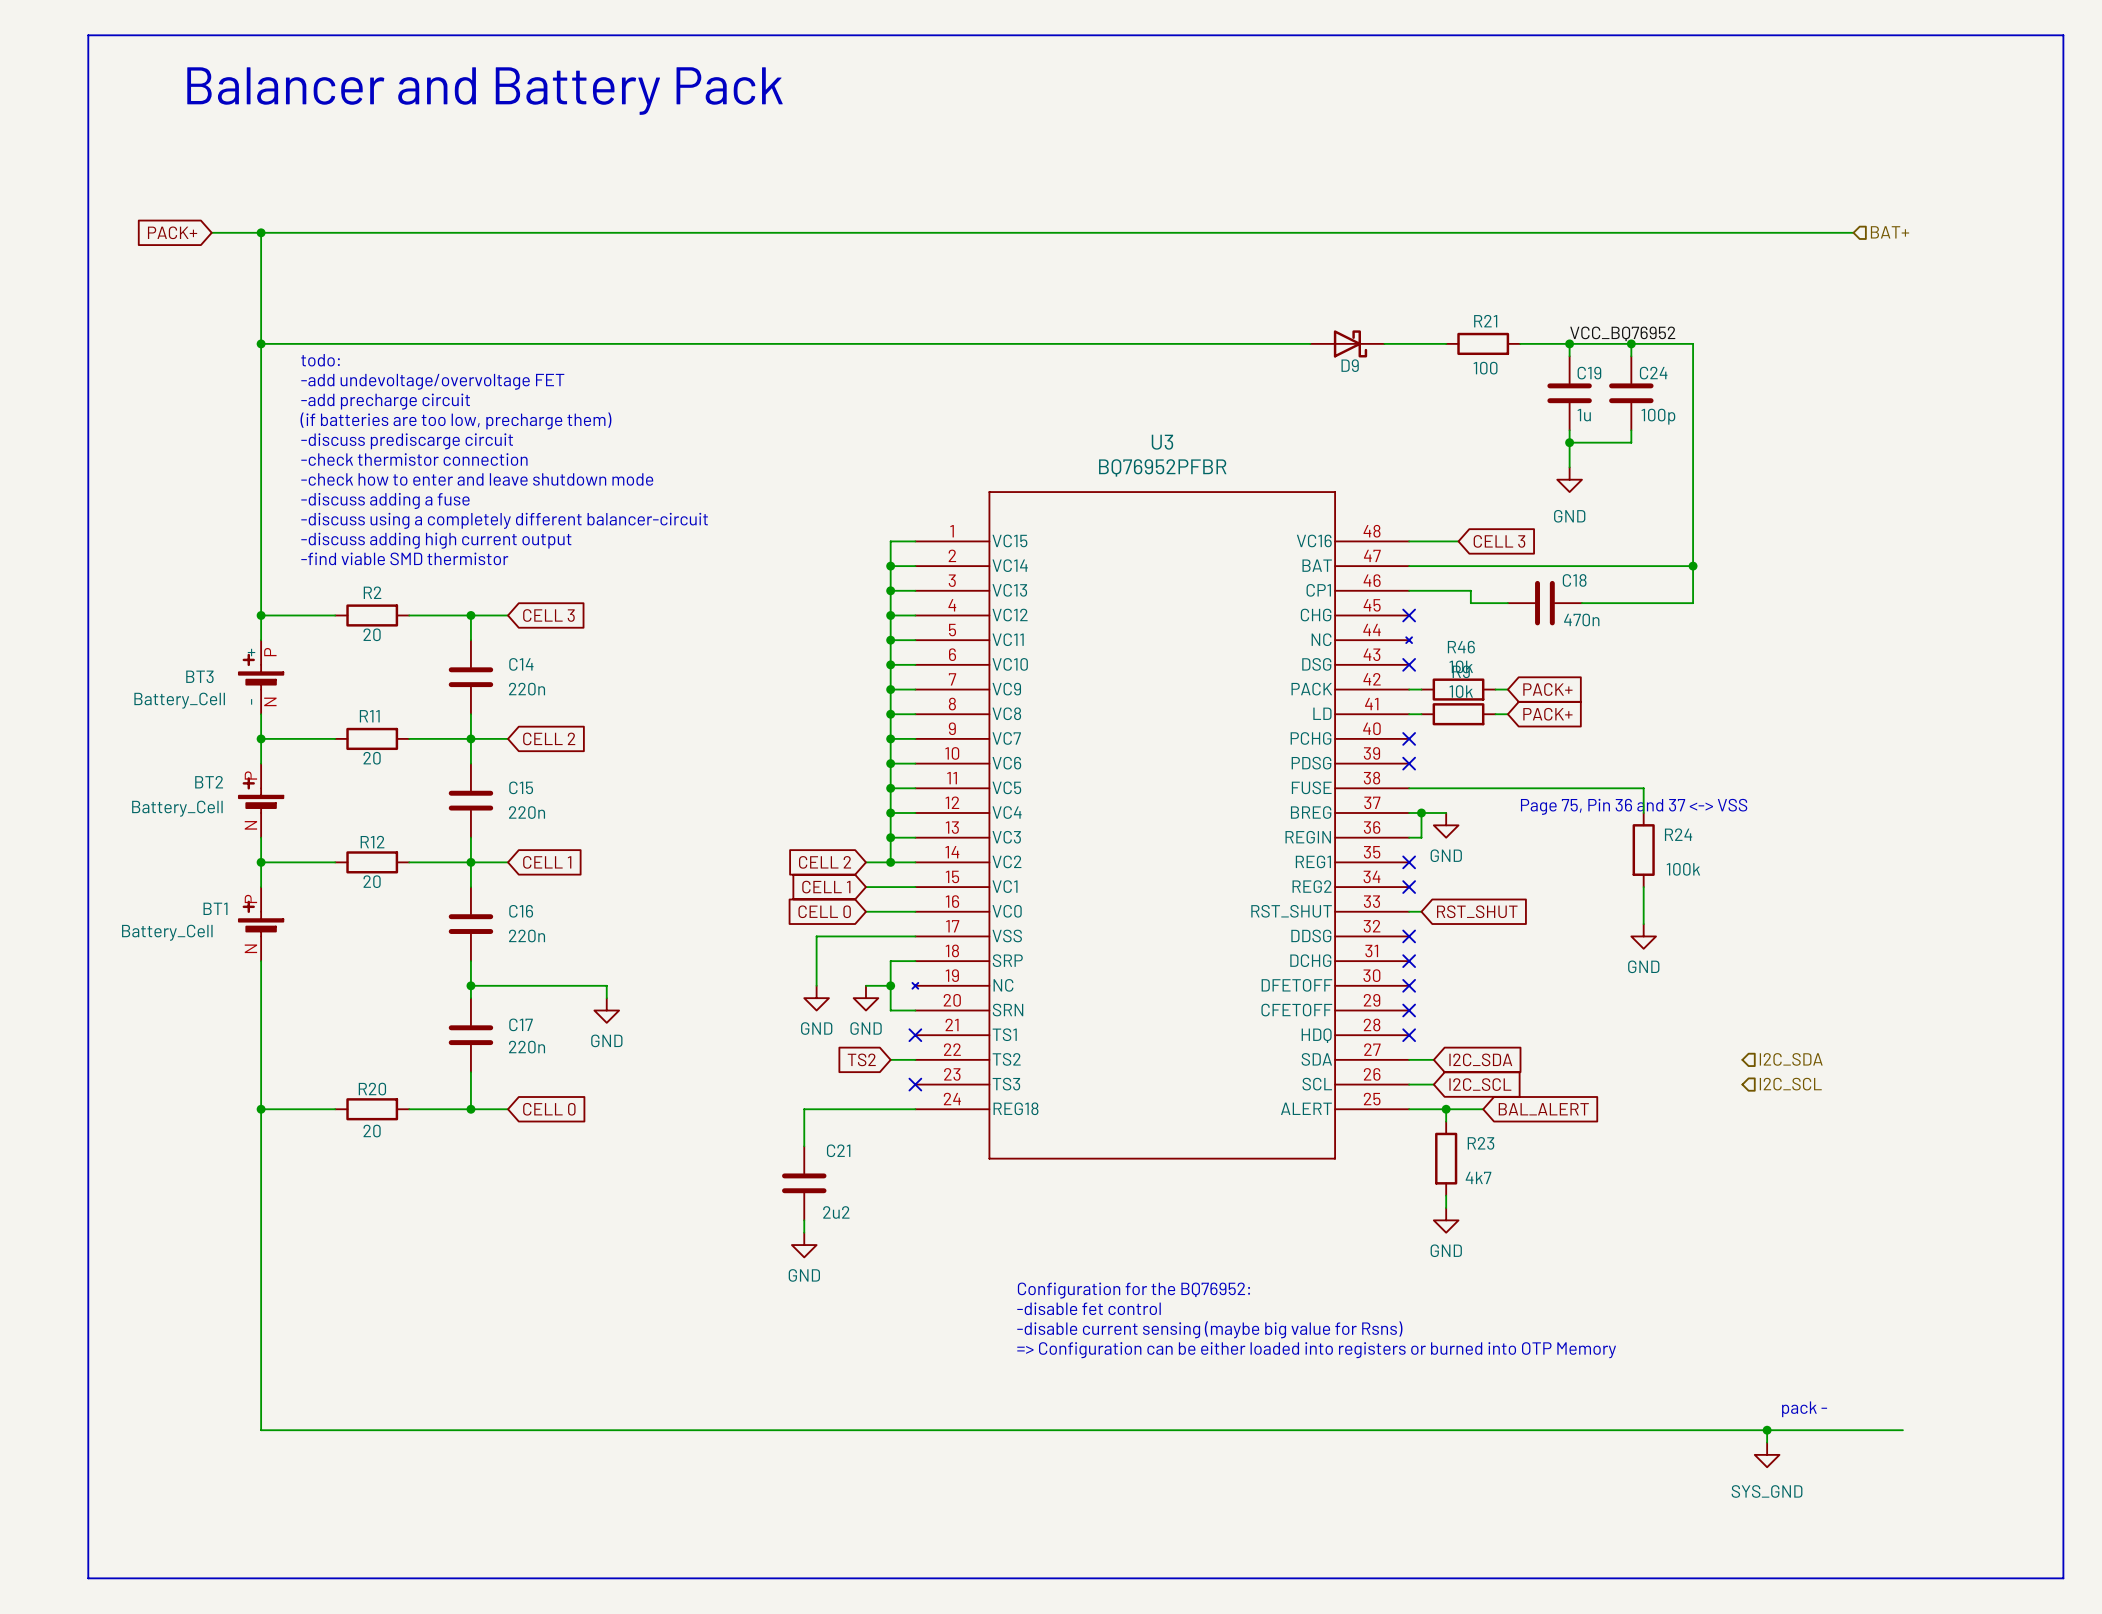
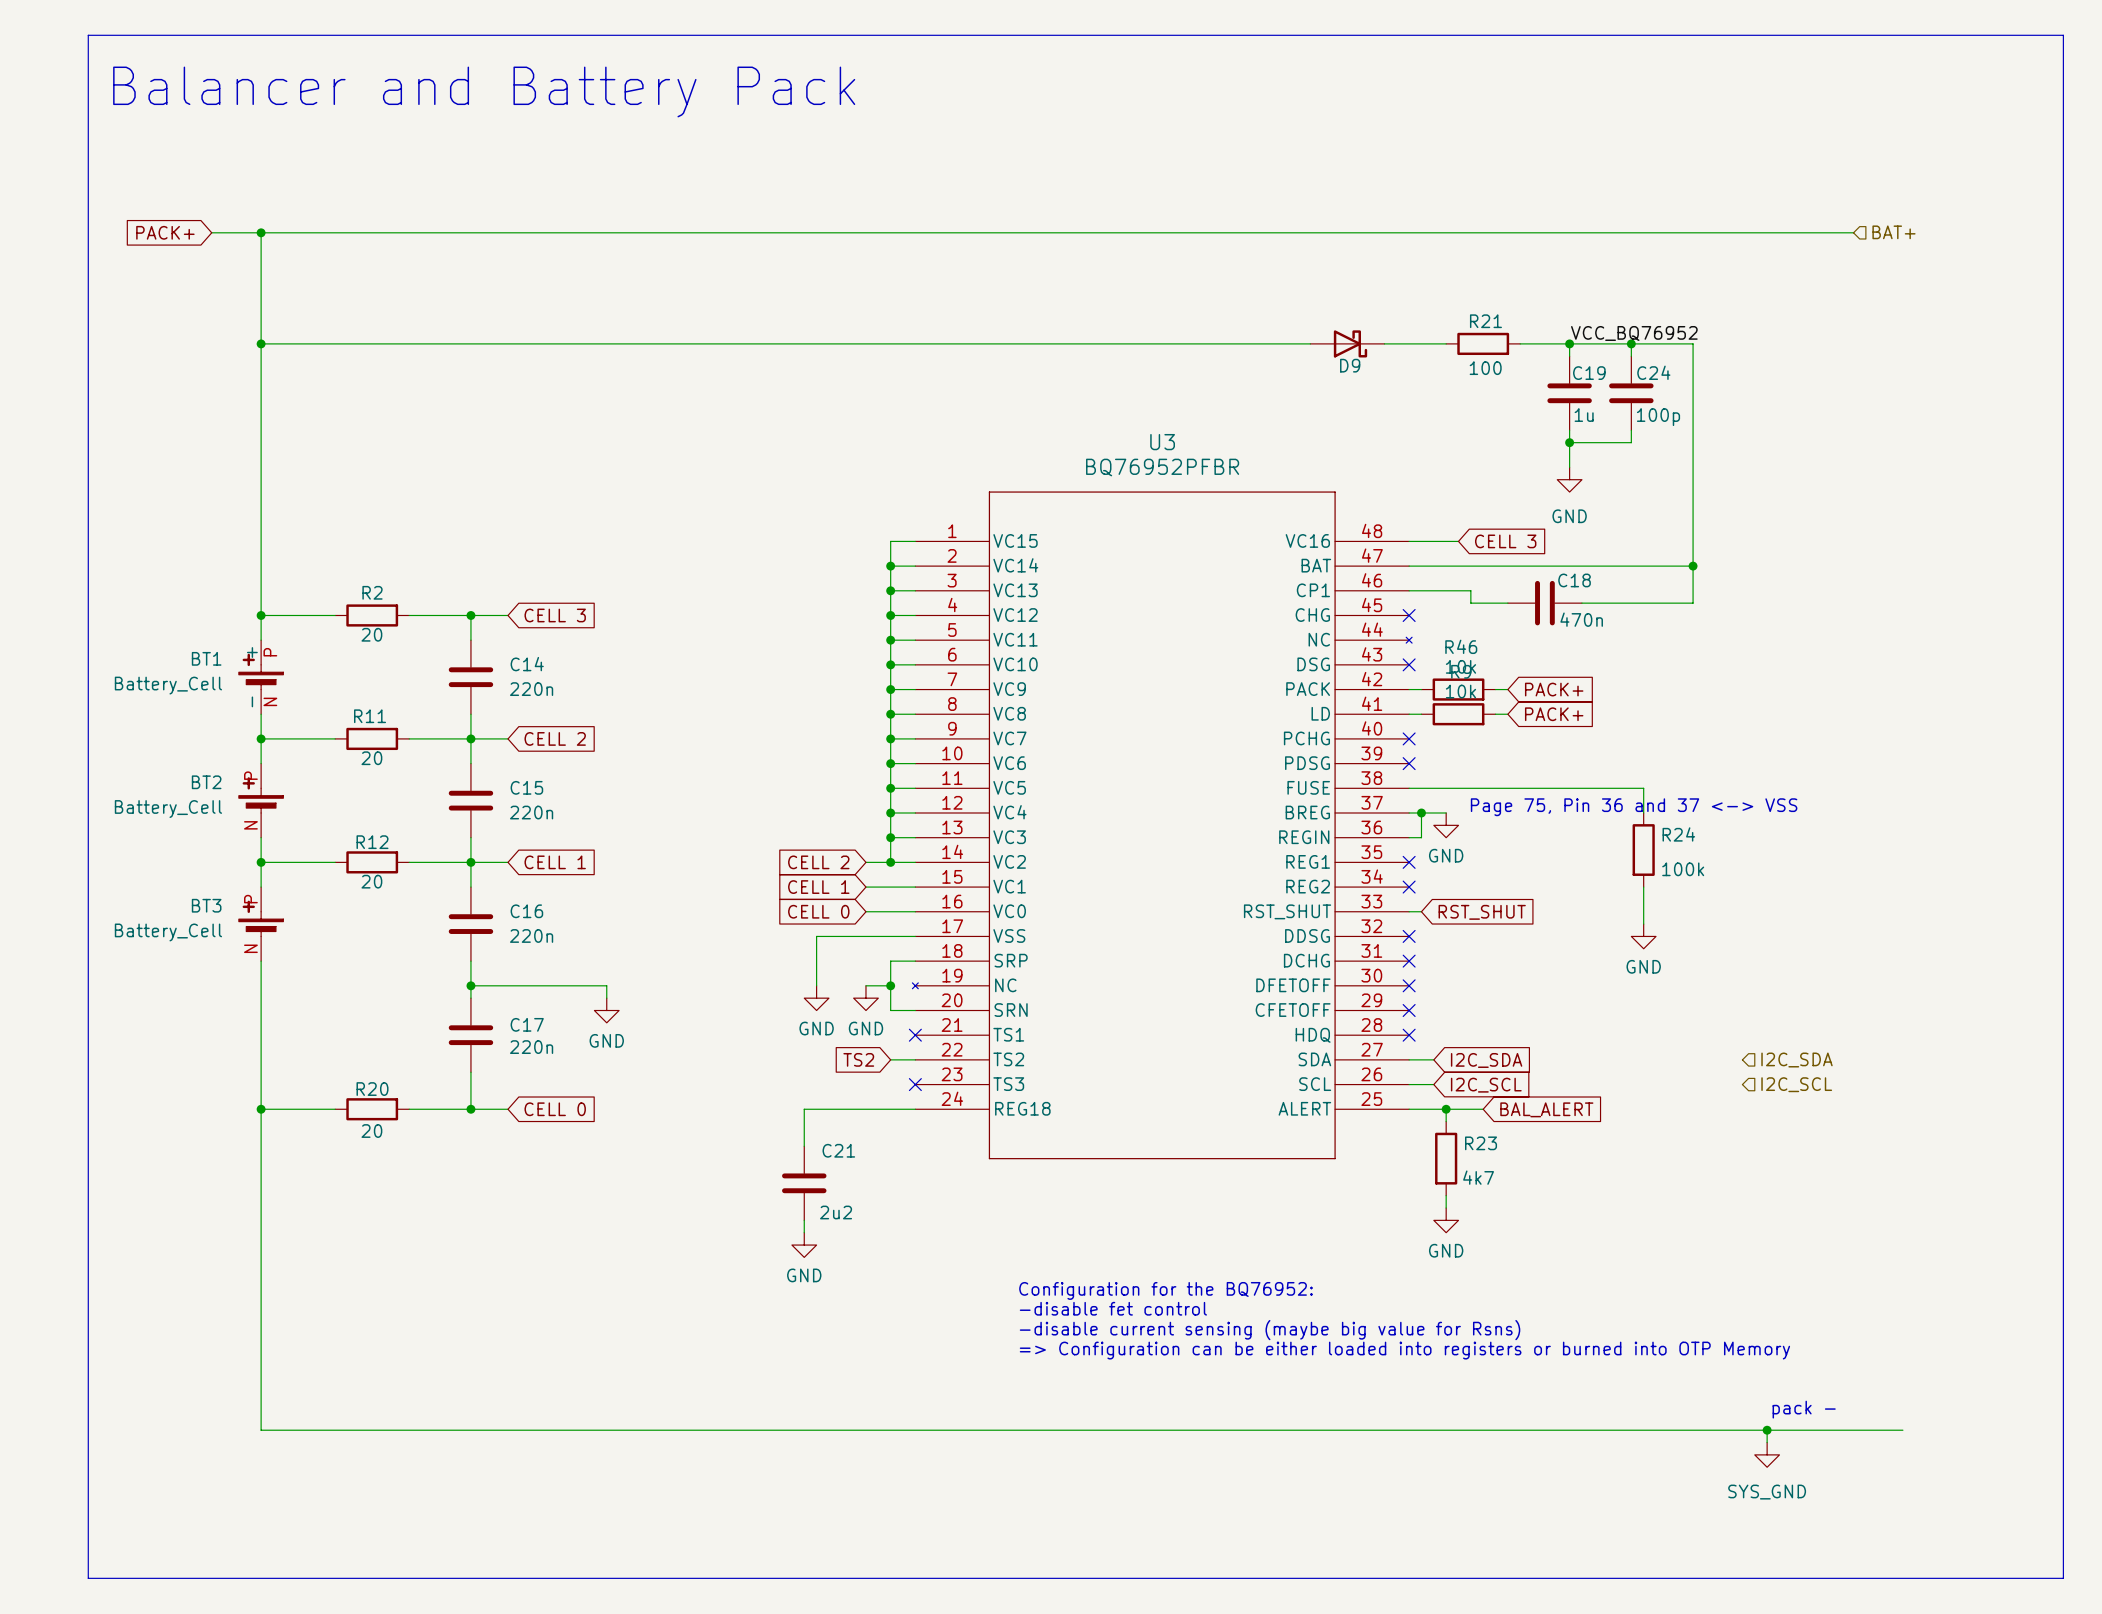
text: todo: (320, 360) -> none
text: -add undevoltage/overvoltage FET (432, 381) -> none
text: -add precharge circuit (385, 401) -> none
text: (if batteries are too low, precharge them) (455, 420) -> none
text: -discuss prediscarge circuit (407, 441) -> none
text: -check thermistor connection (414, 459) -> none
text: -check how to enter and leave shutdown mode (477, 479) -> none
text: -discuss adding a fuse (385, 500) -> none
text: -discuss using a completely different balancer-circuit (504, 520) -> none
text: -discuss adding high current output (436, 540) -> none
text: -find viable SMD thermistor (404, 558) -> none
BT3 name: BT3 (199, 676) -> BT1 (206, 658)
BT3 value position: Battery_Cell (179, 700) -> Battery_Cell (168, 685)
BT1 name: BT1 (215, 908) -> BT3 (206, 905)
BT1 value position: Battery_Cell (167, 932) -> Battery_Cell (168, 932)

